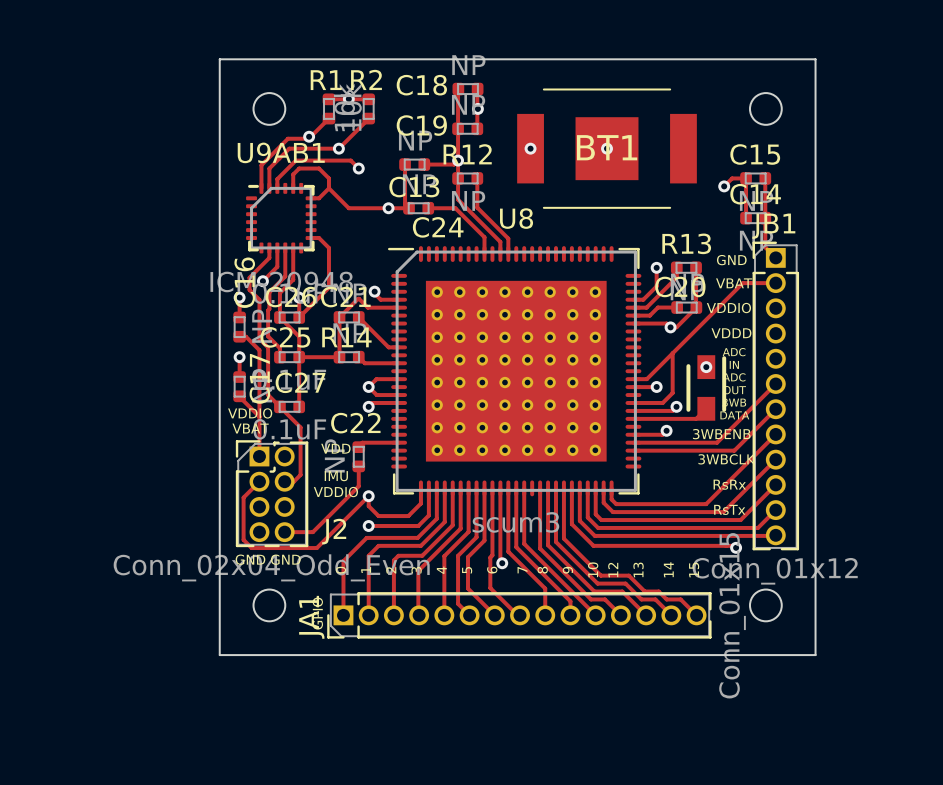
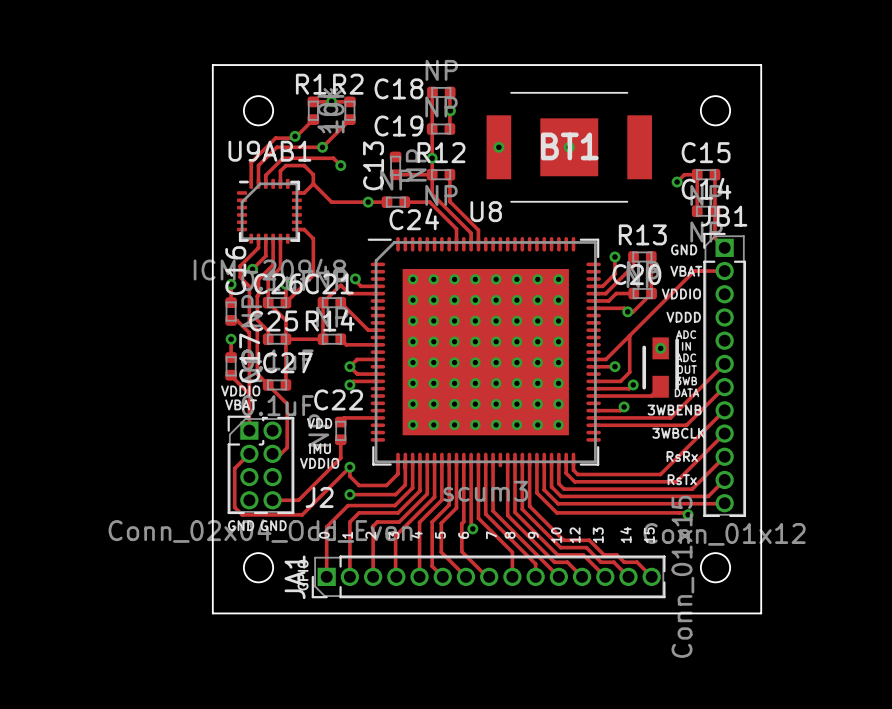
track: (458, 160) (454, 164) (424, 164) -> none
track: (405, 164) (405, 204) (409, 208) -> none
C13 rotation: 0° (414, 164) -> 90° clockwise (395, 165)
track: none -> (395, 174) (432, 174)

